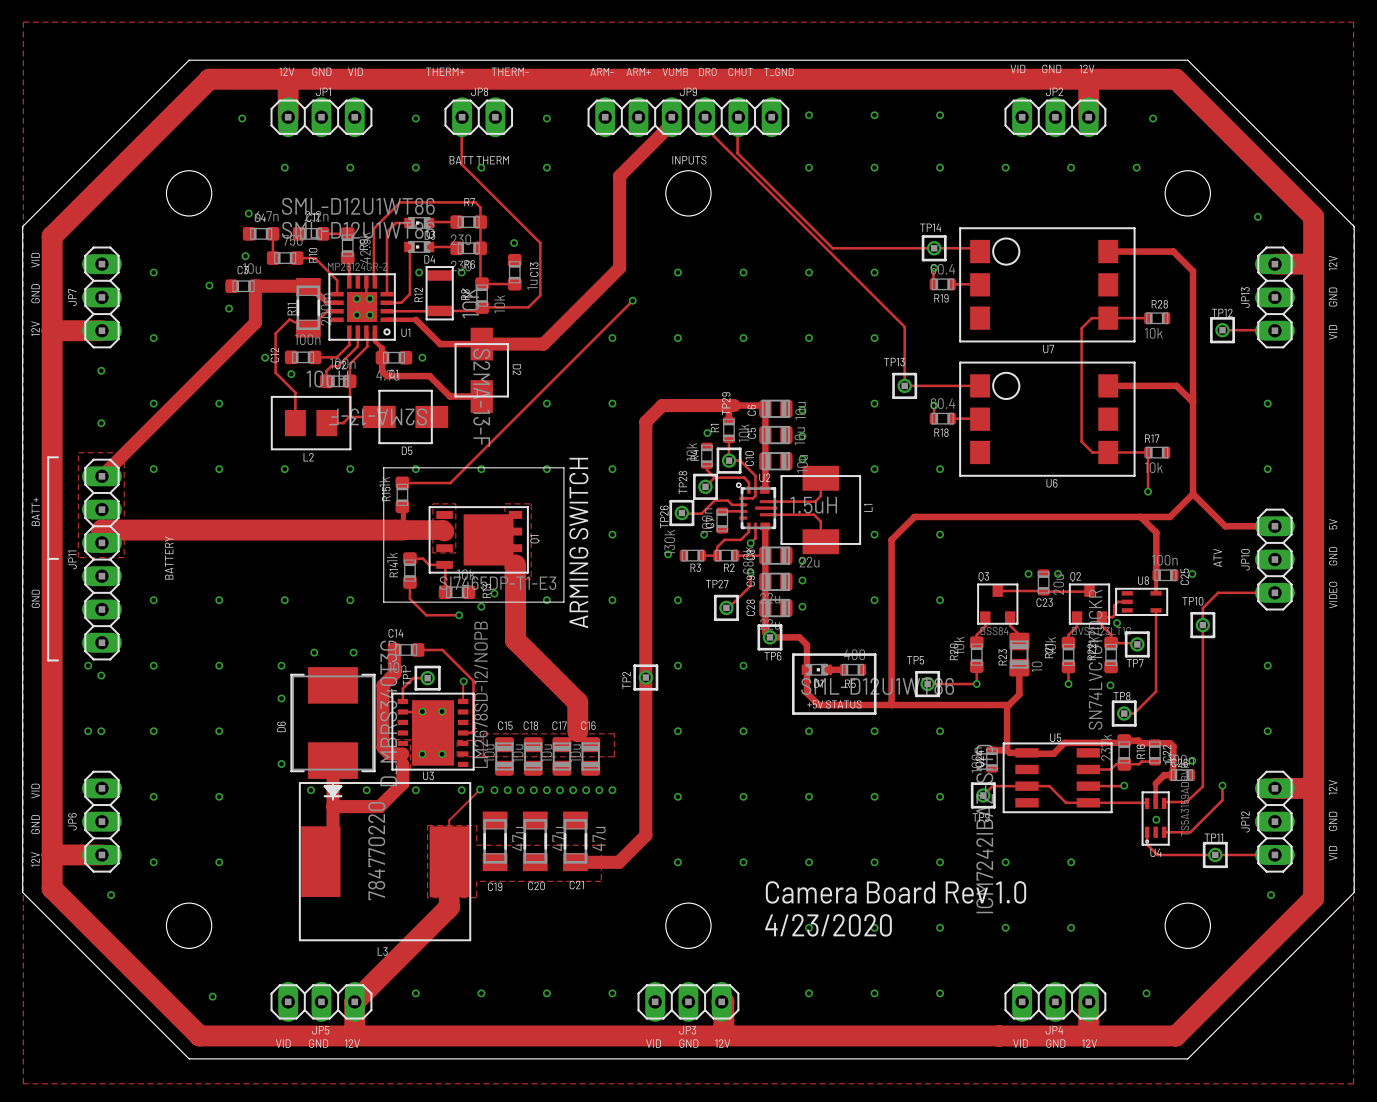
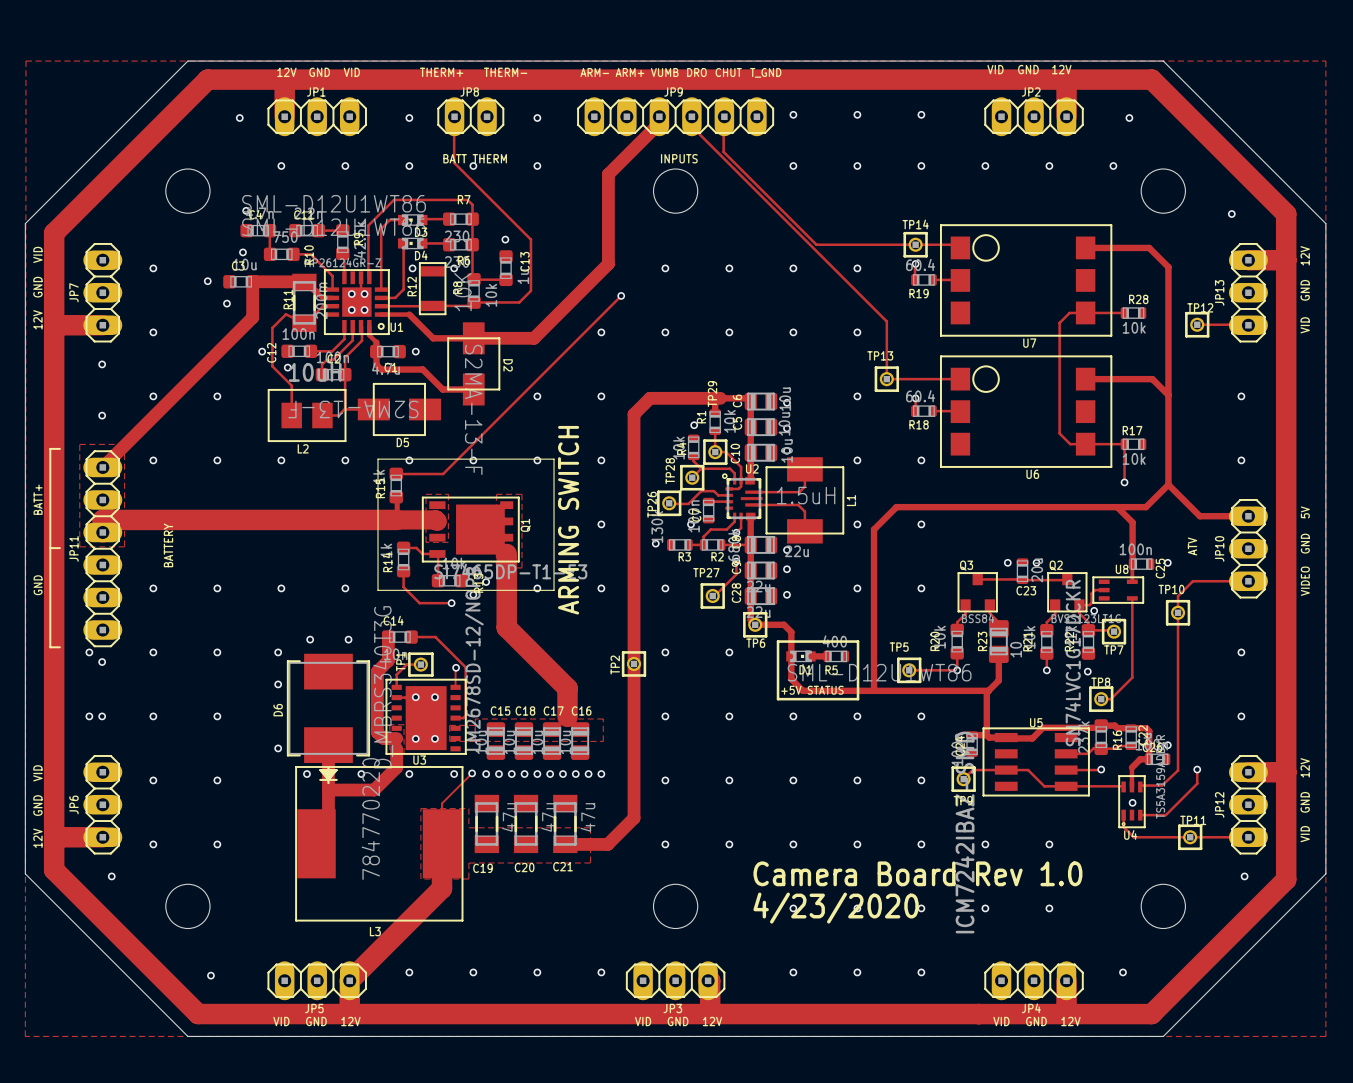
zone outline: (23, 22) (23, 1083) (1353, 1083) (1353, 22) (23, 22) -> (25, 61) (25, 1036) (1325, 1036) (1325, 61) (25, 61)

